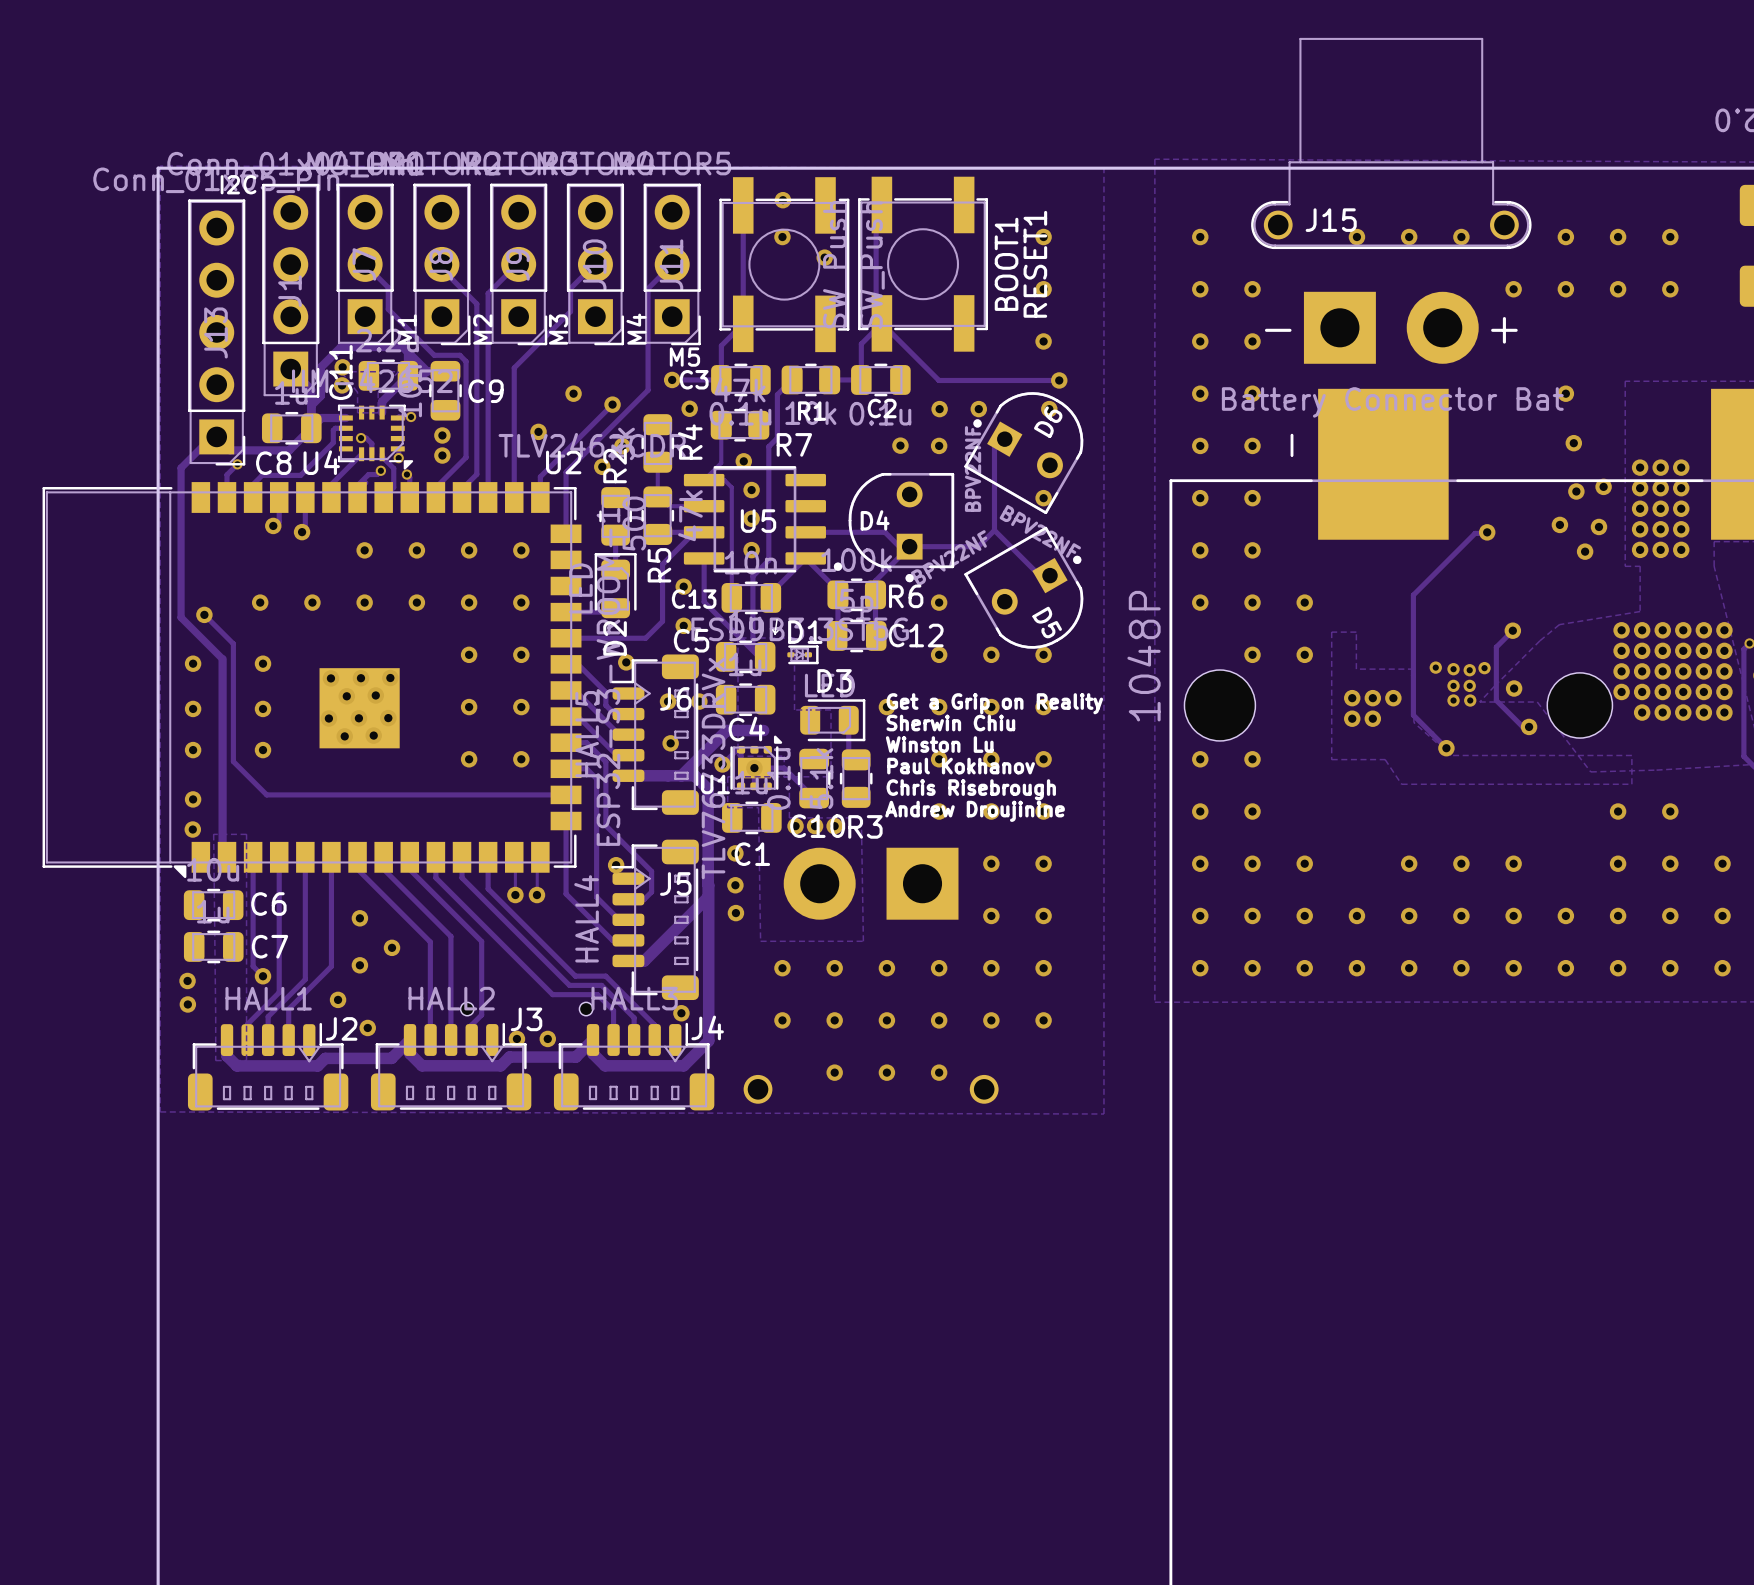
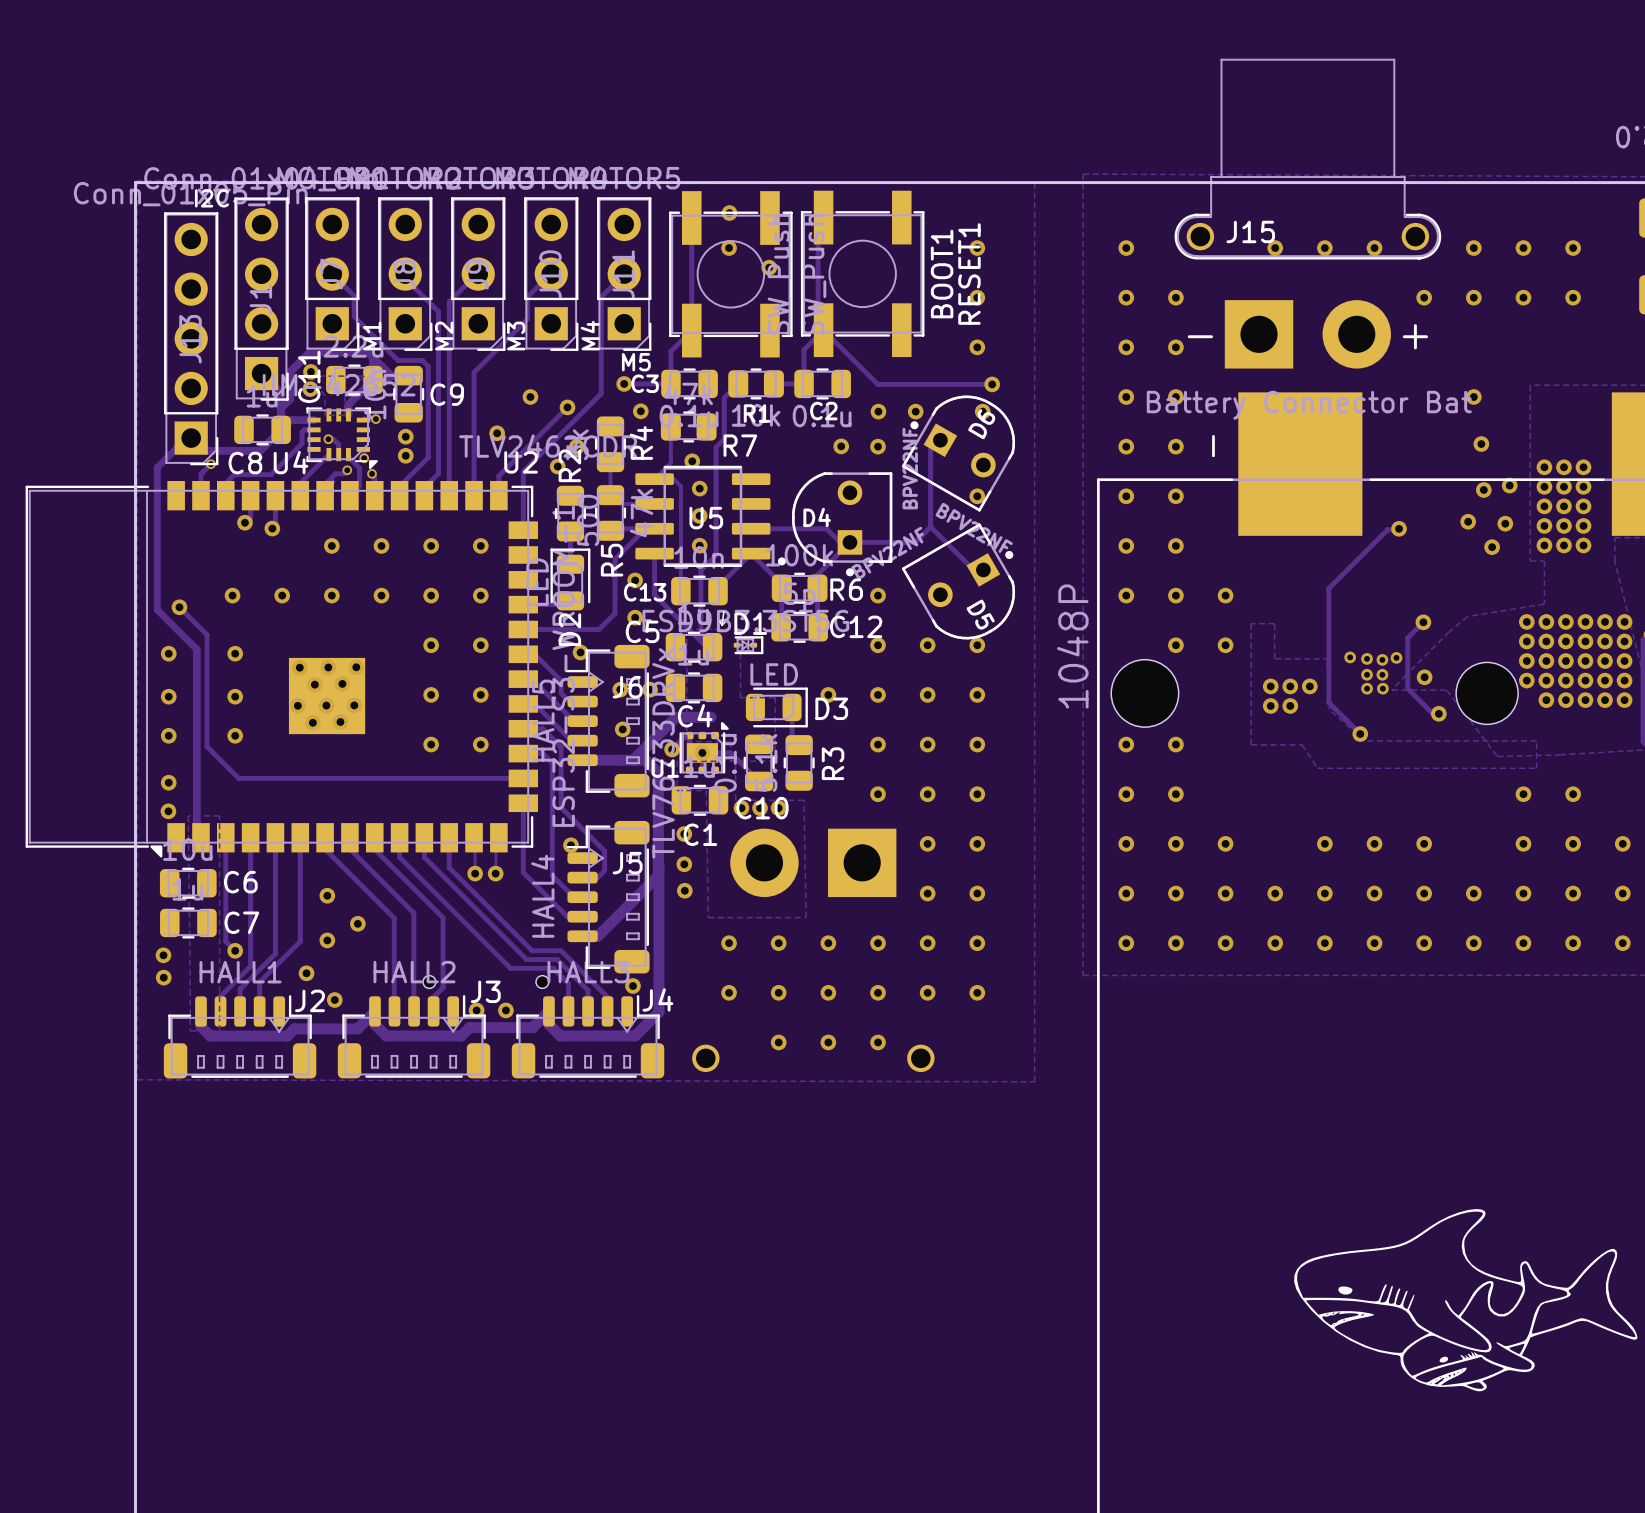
D3 name position: D3 (834, 680) -> D3 (831, 708)
text: Get a Grip on Reality (994, 703) -> none
text: Sherwin Chiu (950, 723) -> none
text: Winston Lu (939, 744) -> none
text: Paul Kokhanov (961, 766) -> none
text: Chris Risebrough (971, 789) -> none
text: Andrew Droujinine (975, 811) -> none
R3 name rotation: 0° (865, 826) -> 90° counterclockwise (833, 763)
R3 name position: R3 (865, 826) -> R3 (833, 763)
drawing: none -> [1294, 1209, 1638, 1392]

